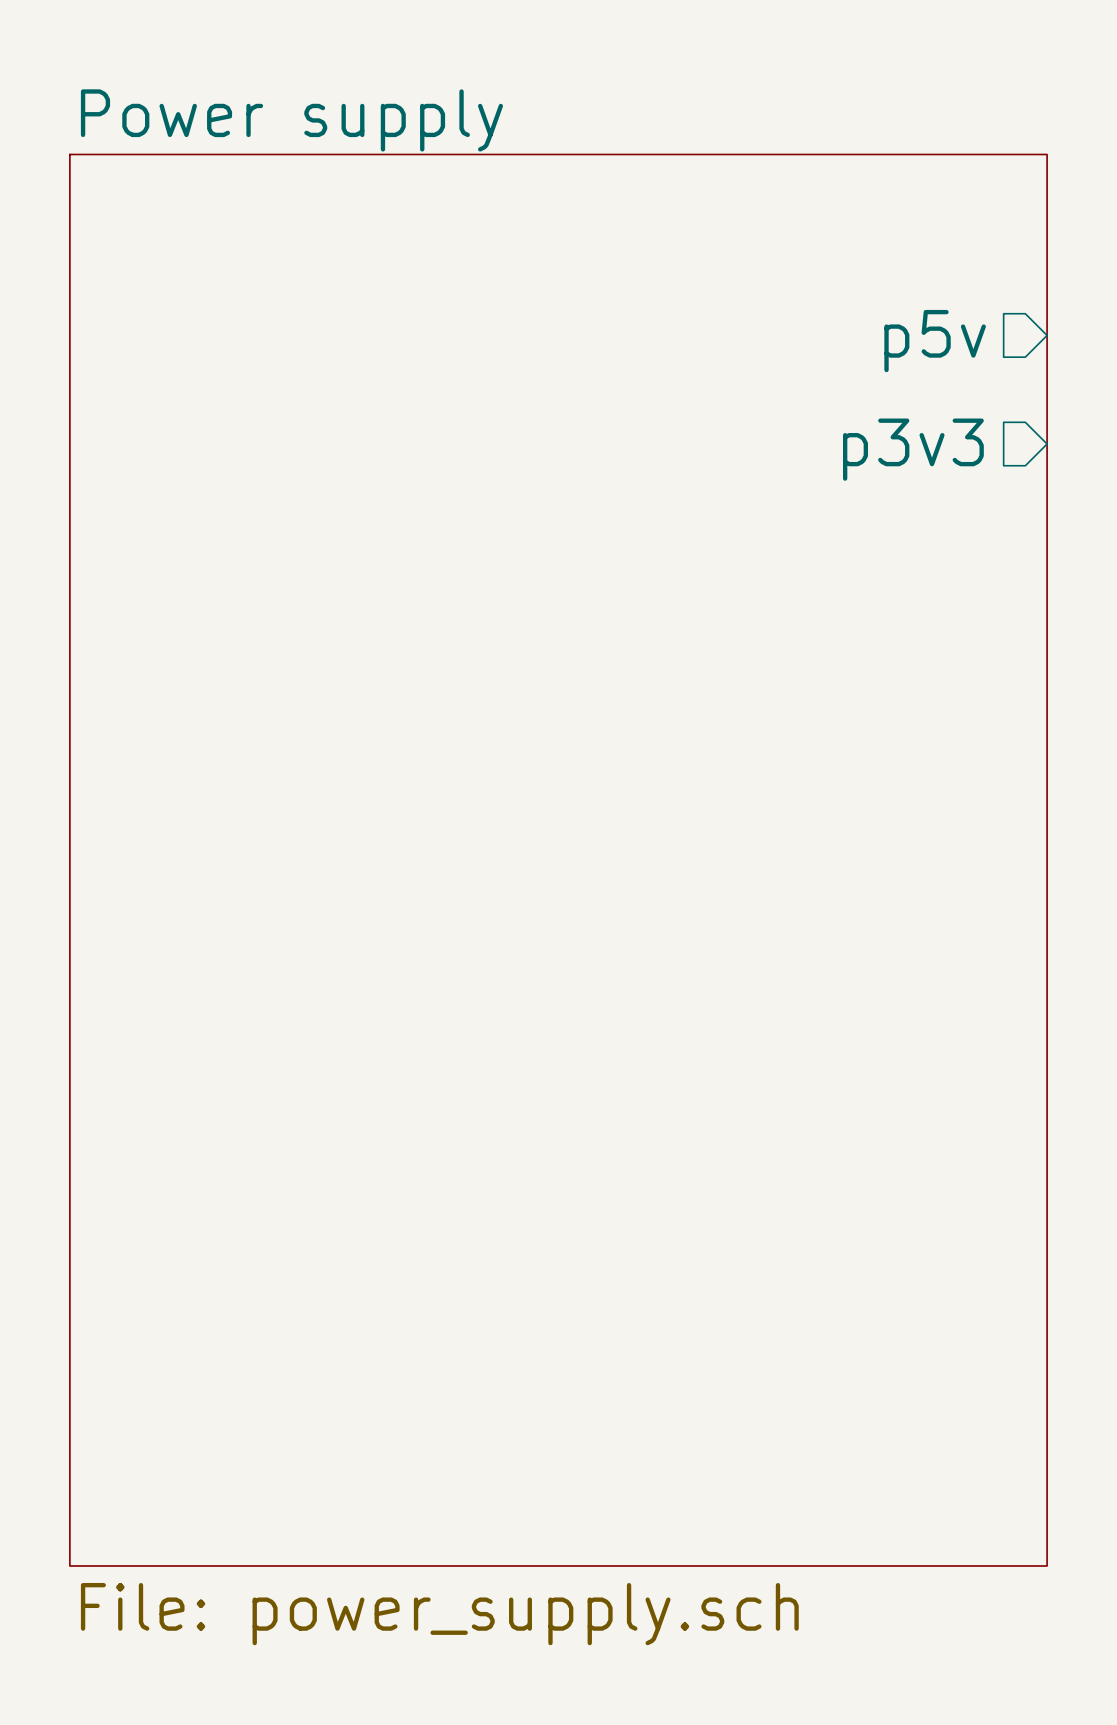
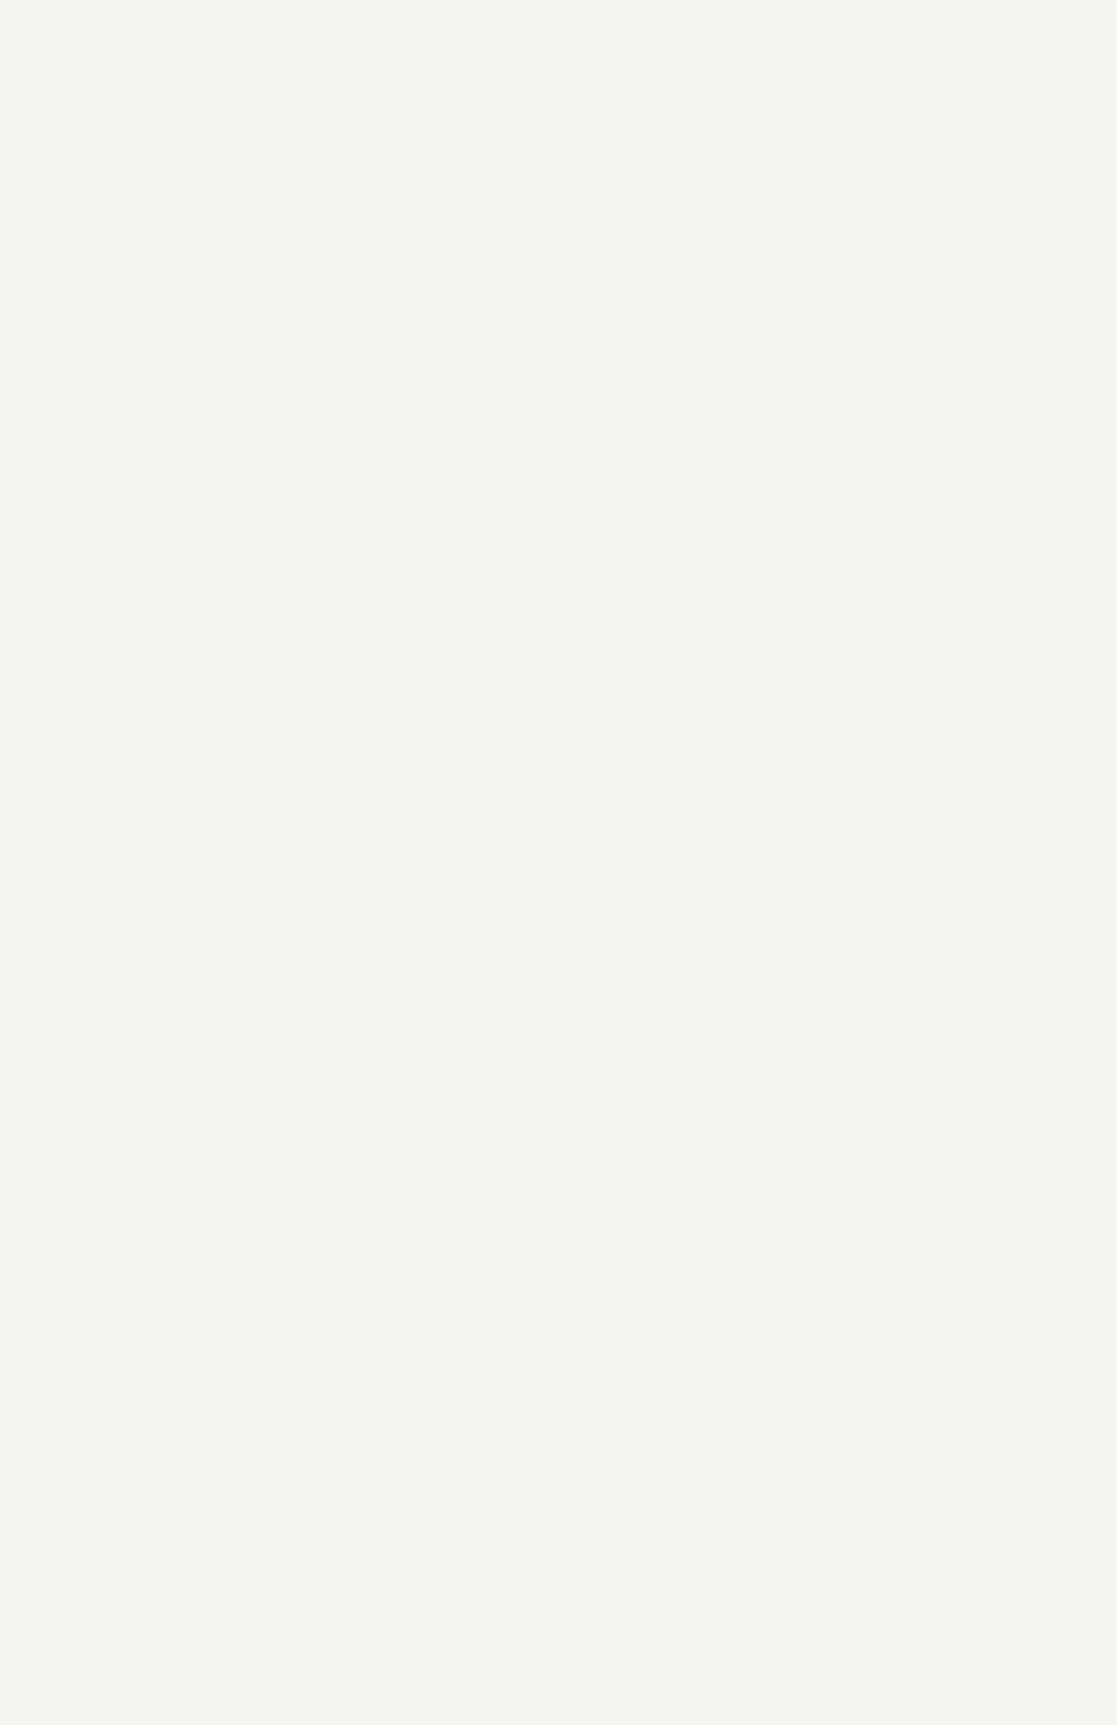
sheet pin: p5v (935, 341) -> none
sheet pin: p3v3 (913, 449) -> none
sheet Power supply: File: power_supply.sch (558, 860) -> none

